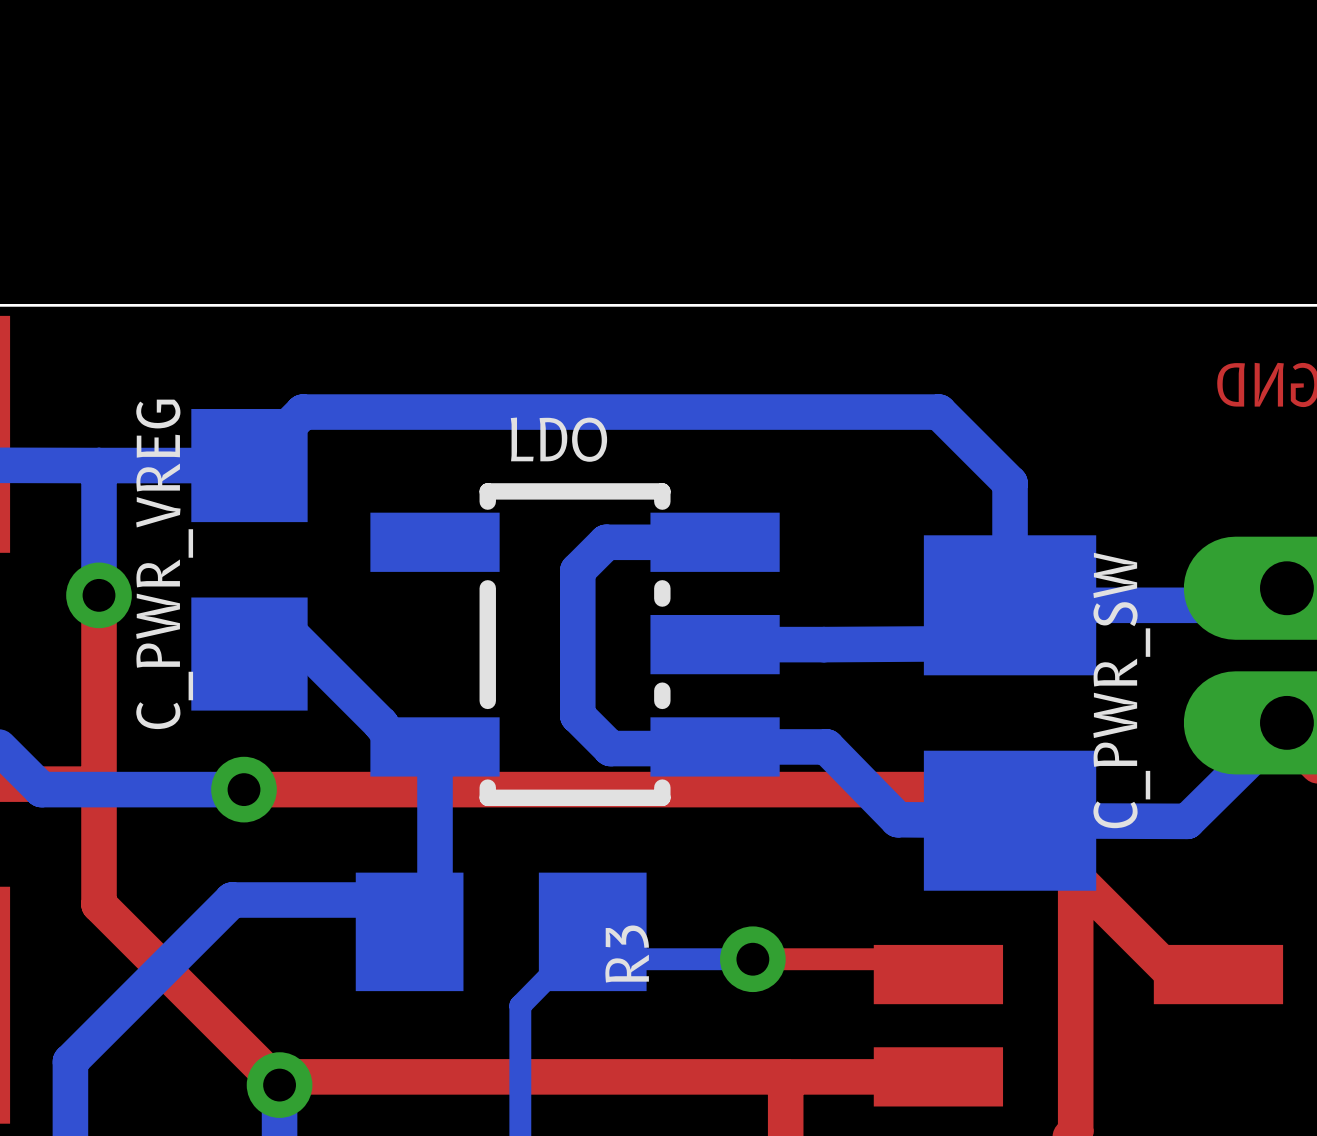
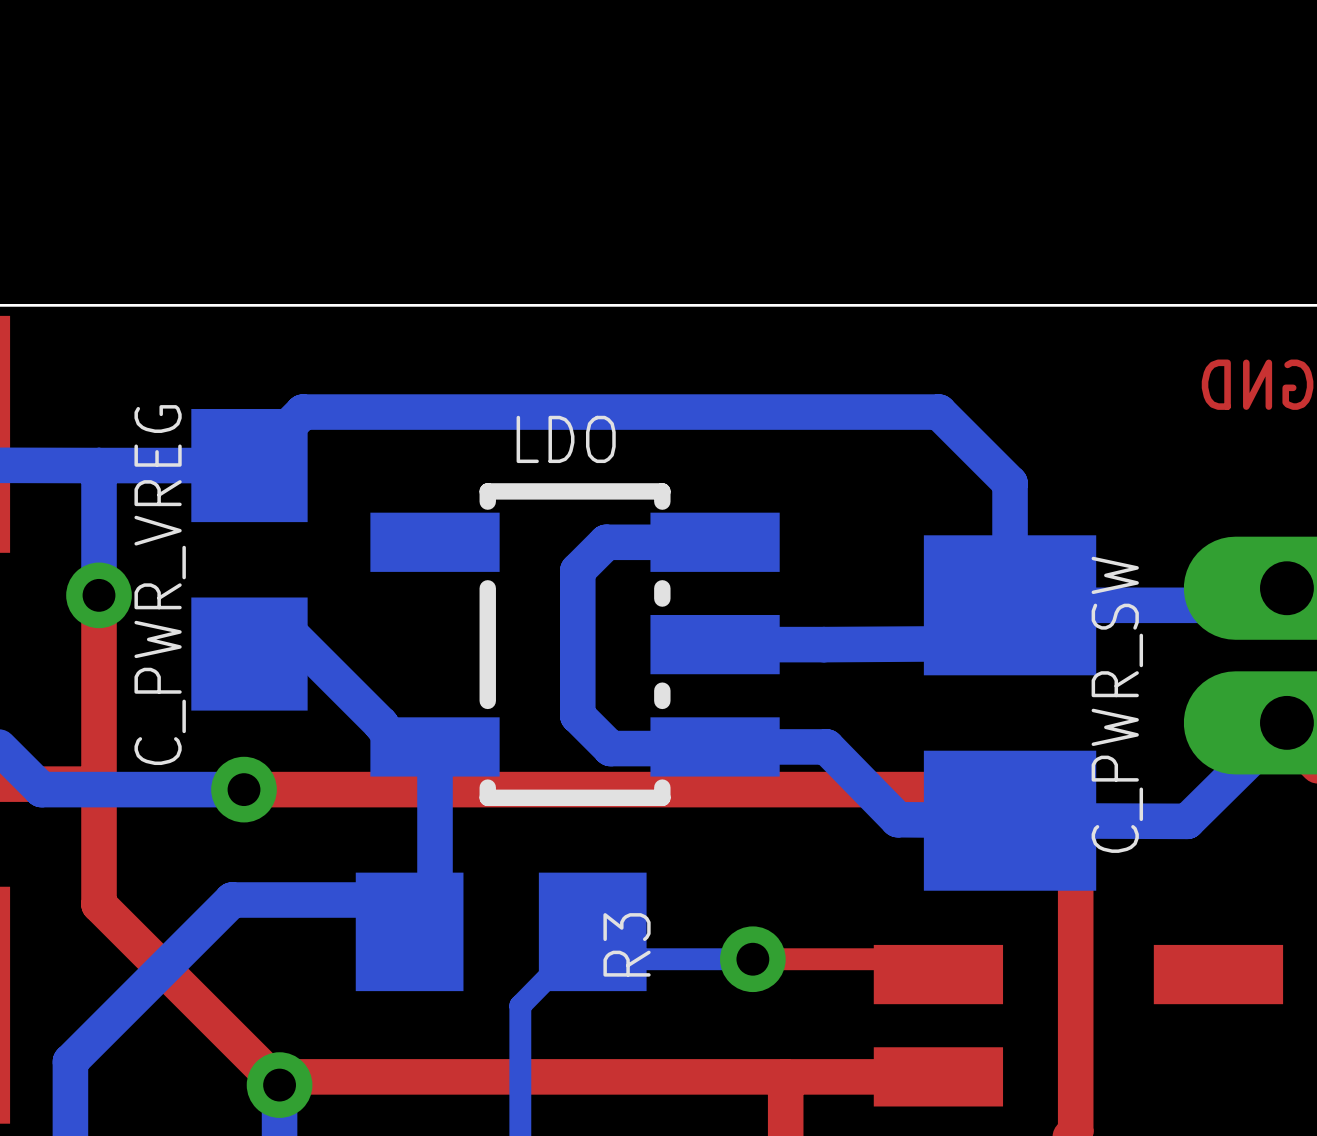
top track: (1075, 877) (1173, 974) (1218, 974) -> none

